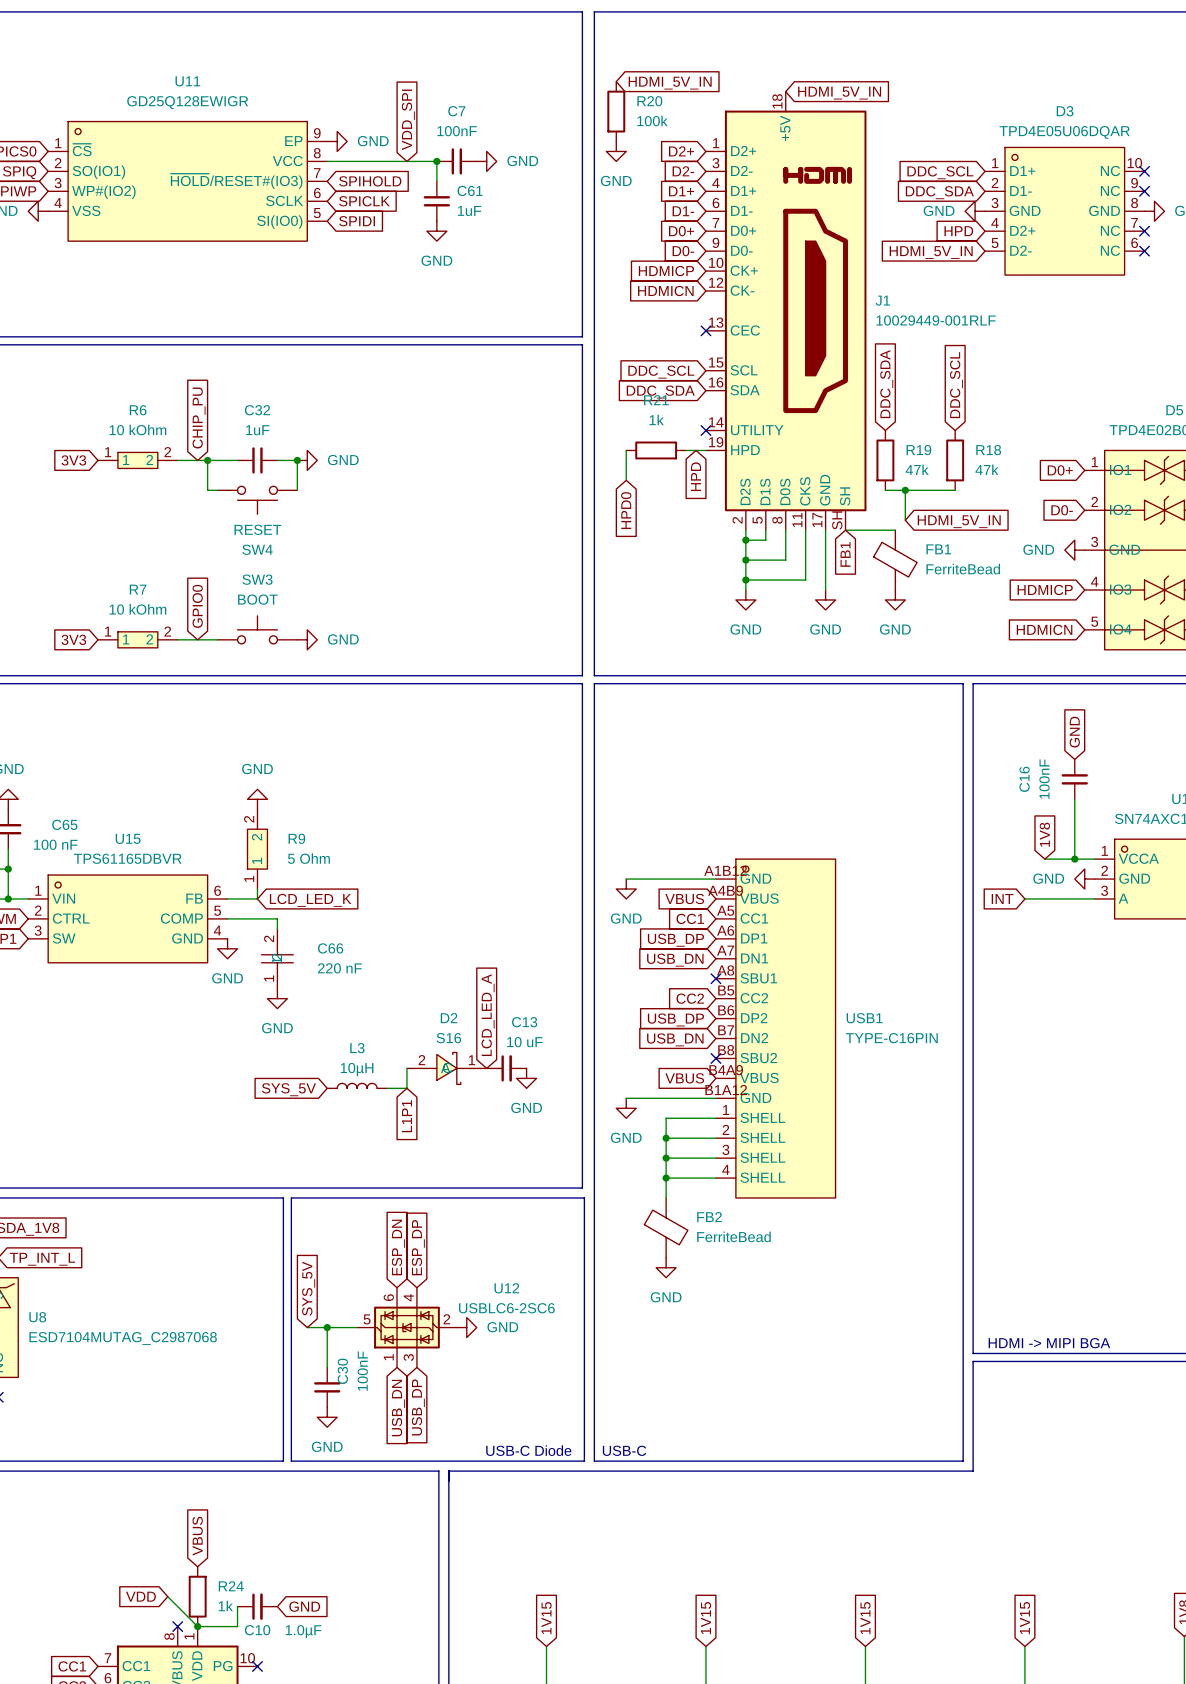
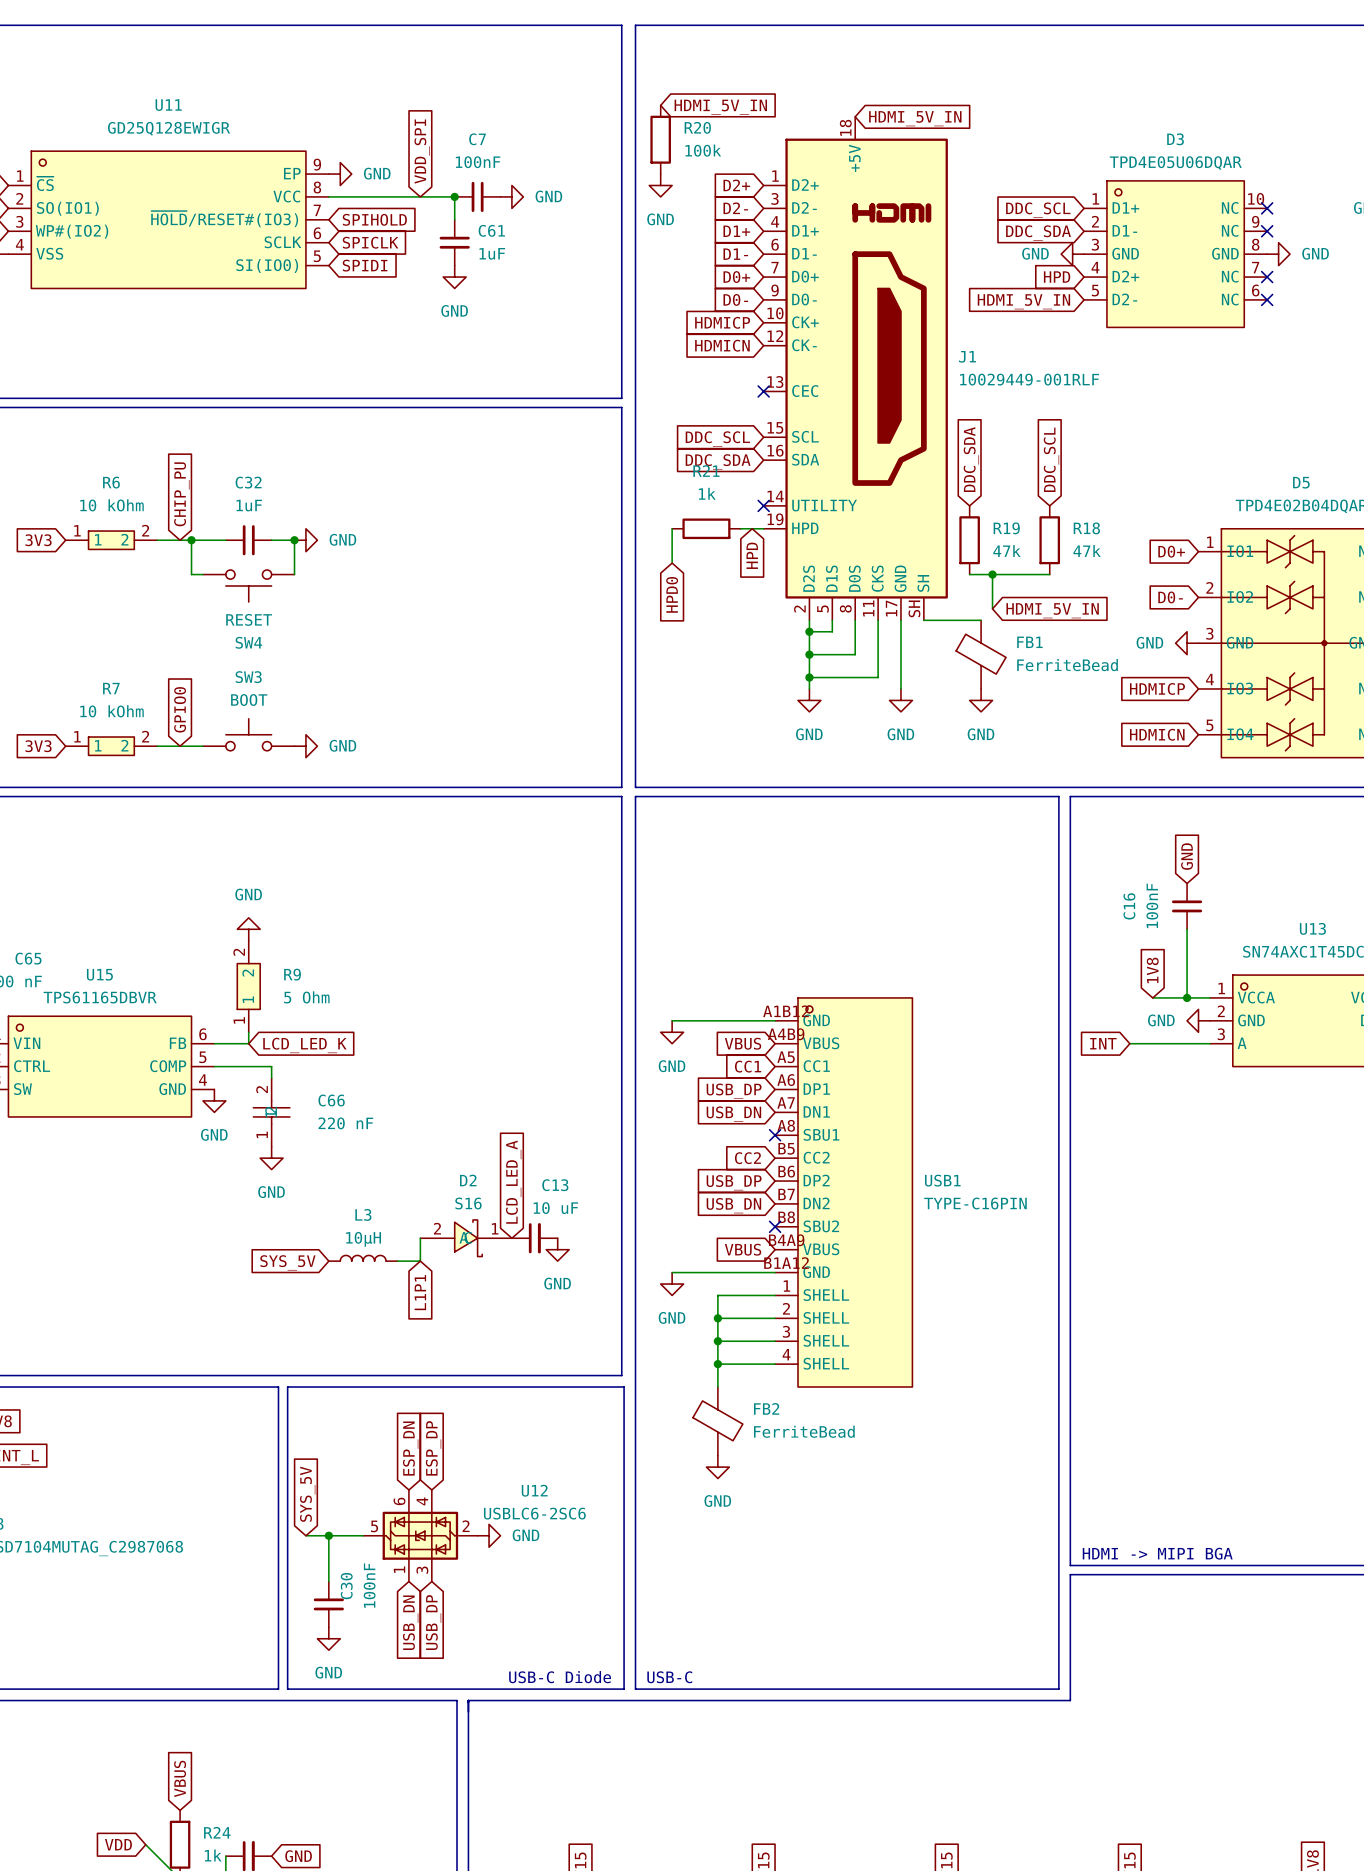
global label: FB1 (845, 554) -> none

